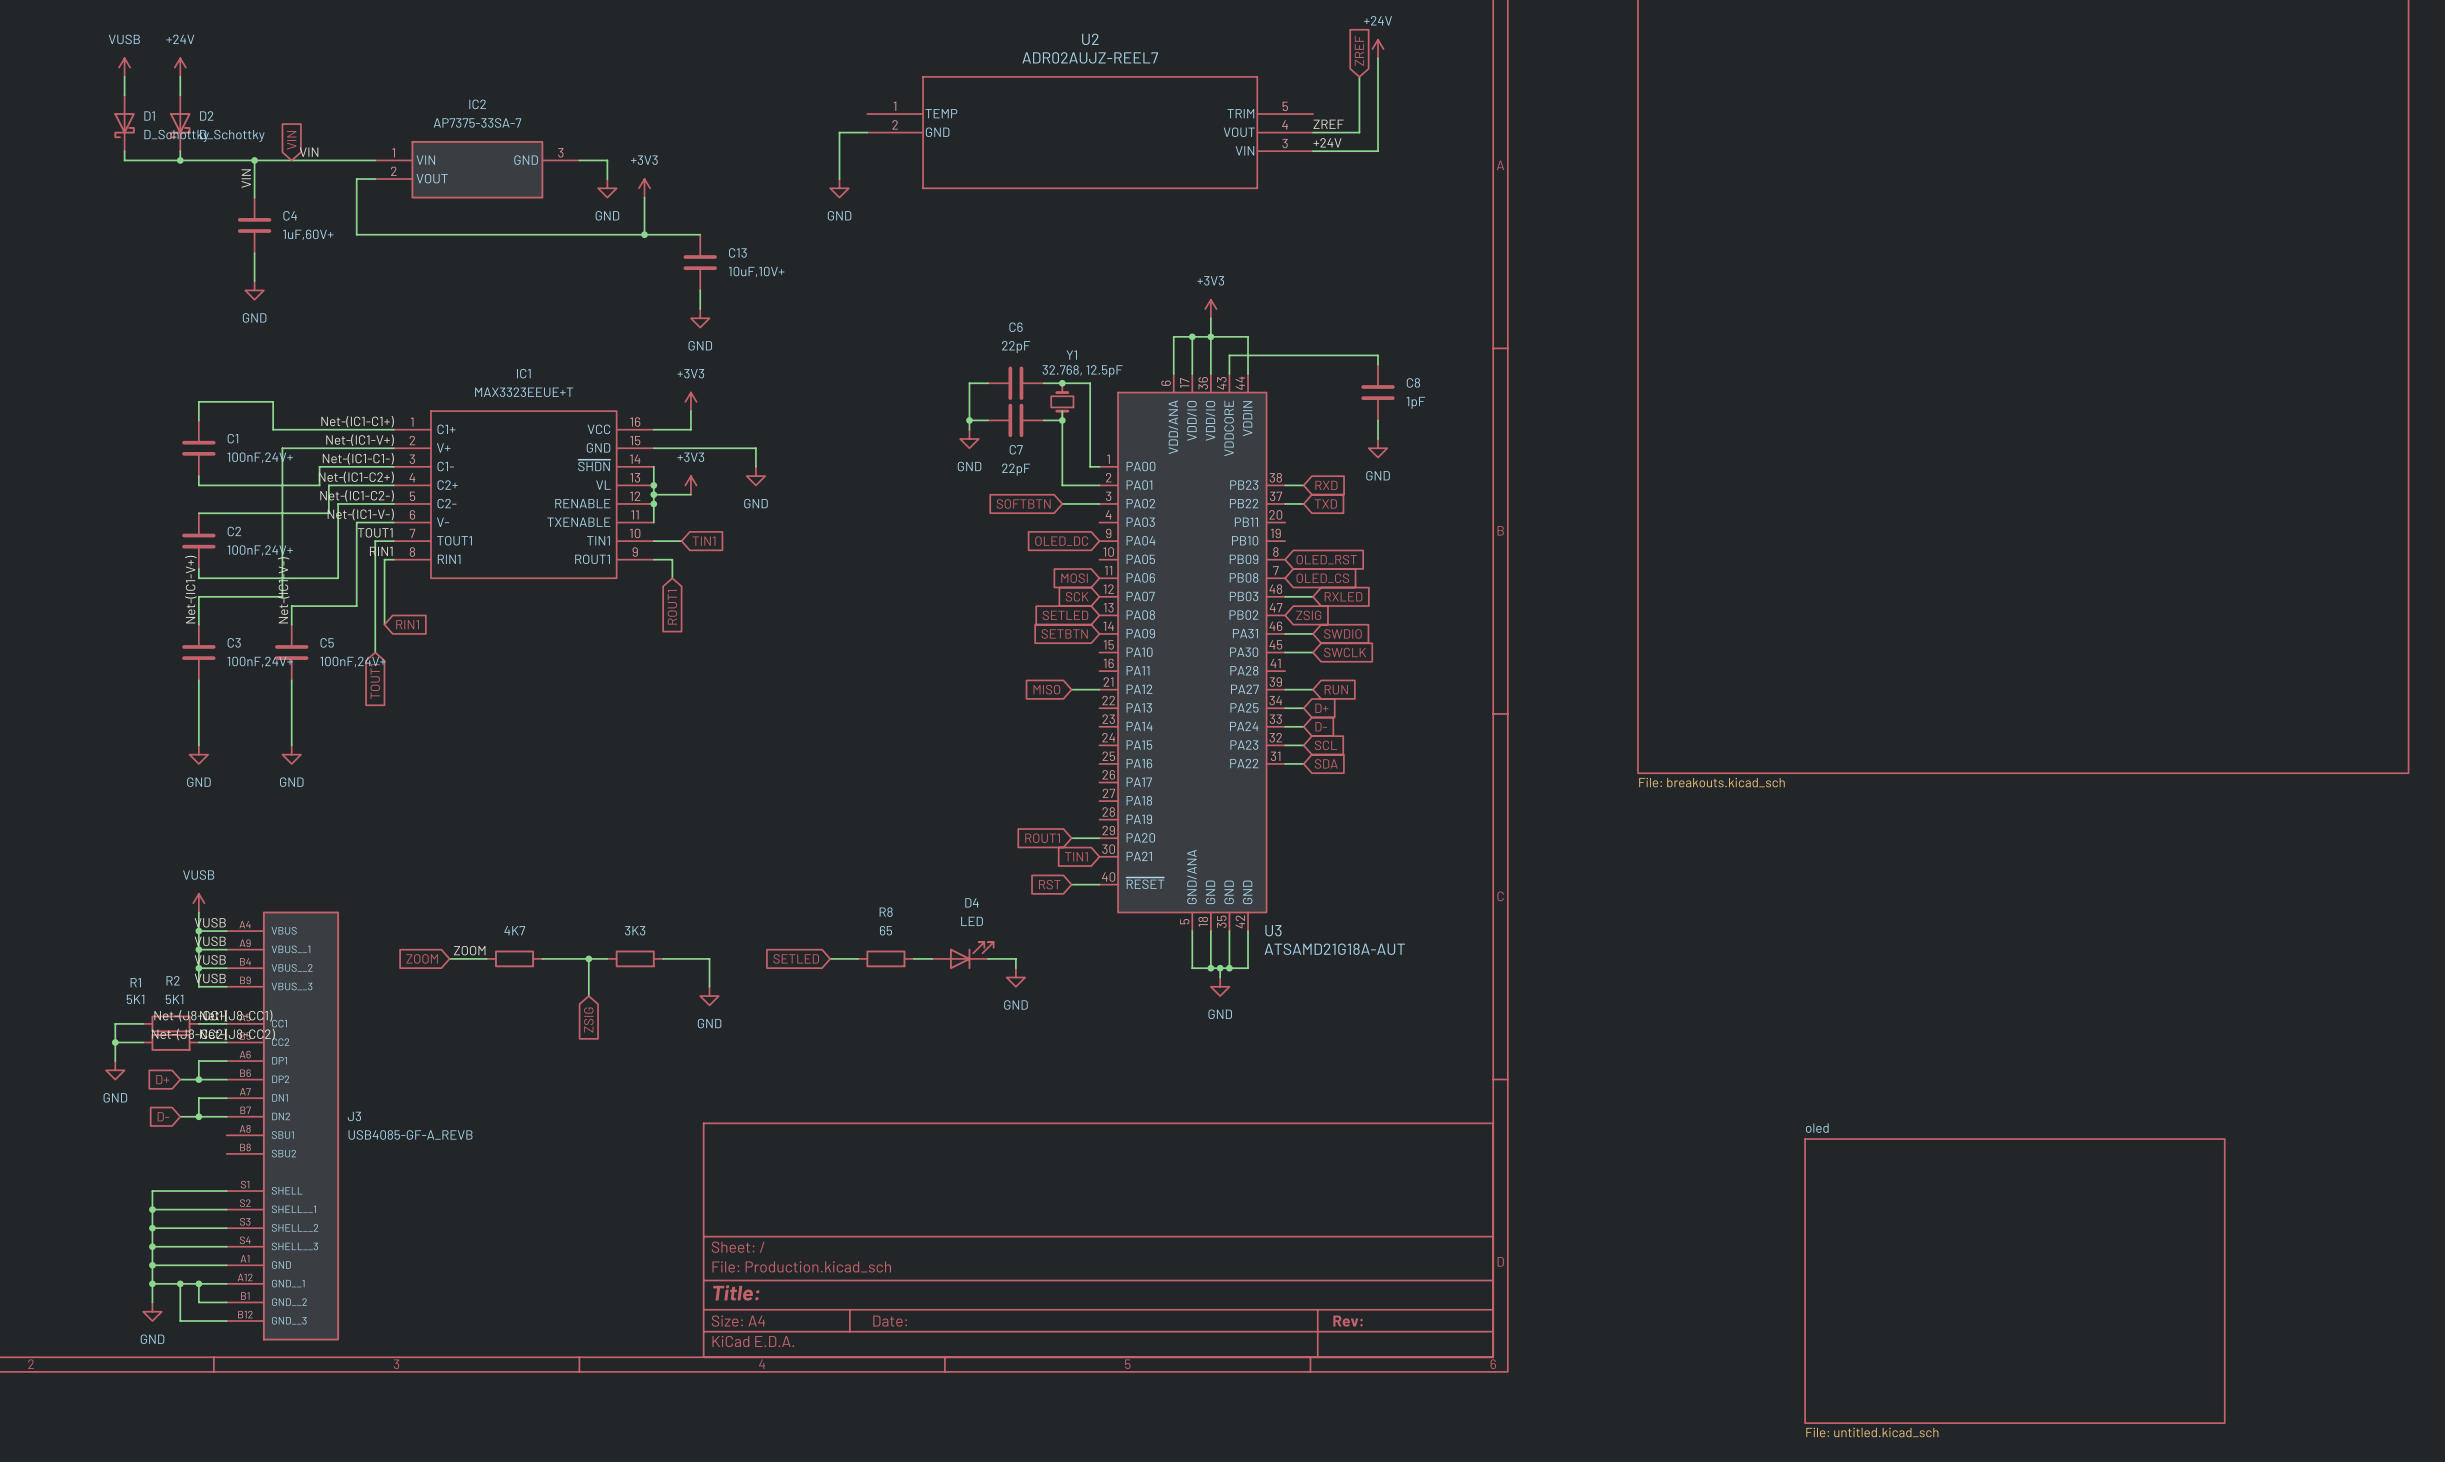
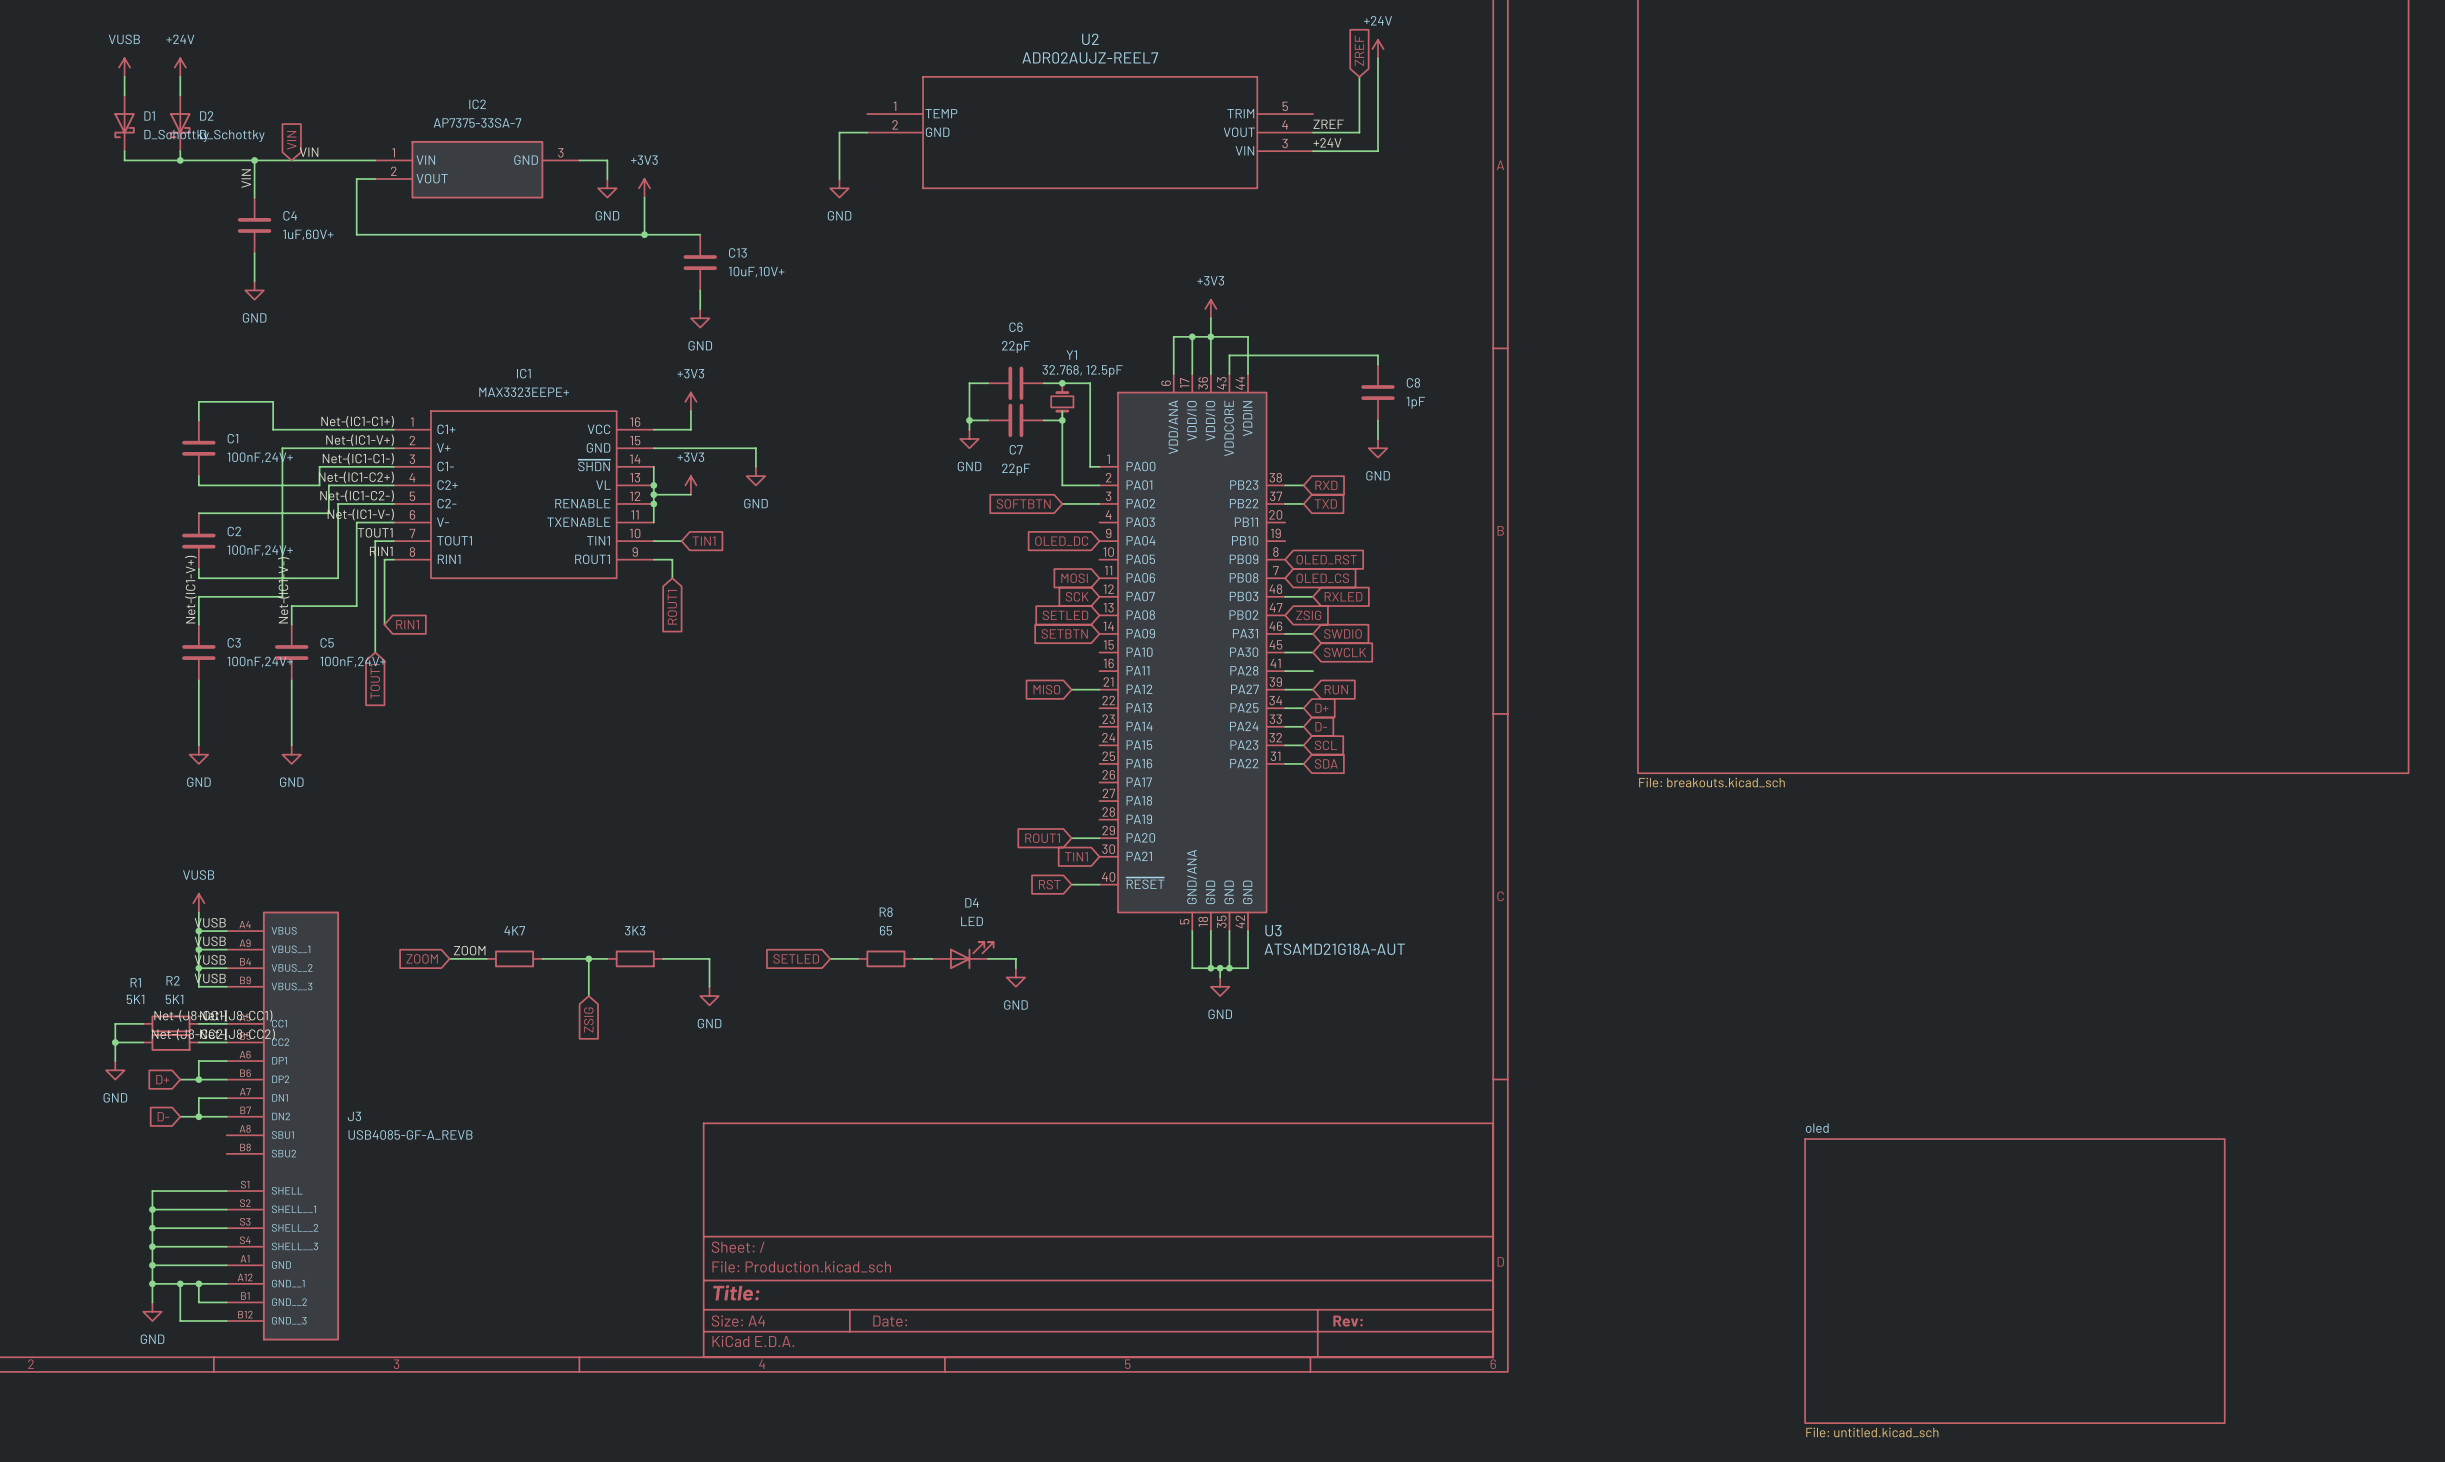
IC1 value: MAX3323EEUE+T (524, 392) -> MAX3323EEPE+ (524, 392)
wire: none -> (1285, 671) (1313, 671)

